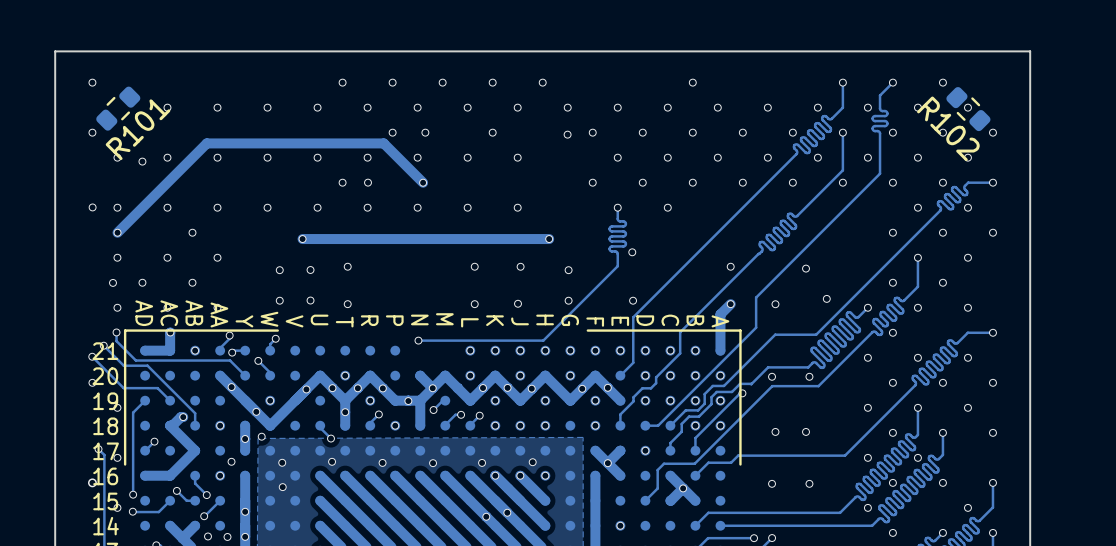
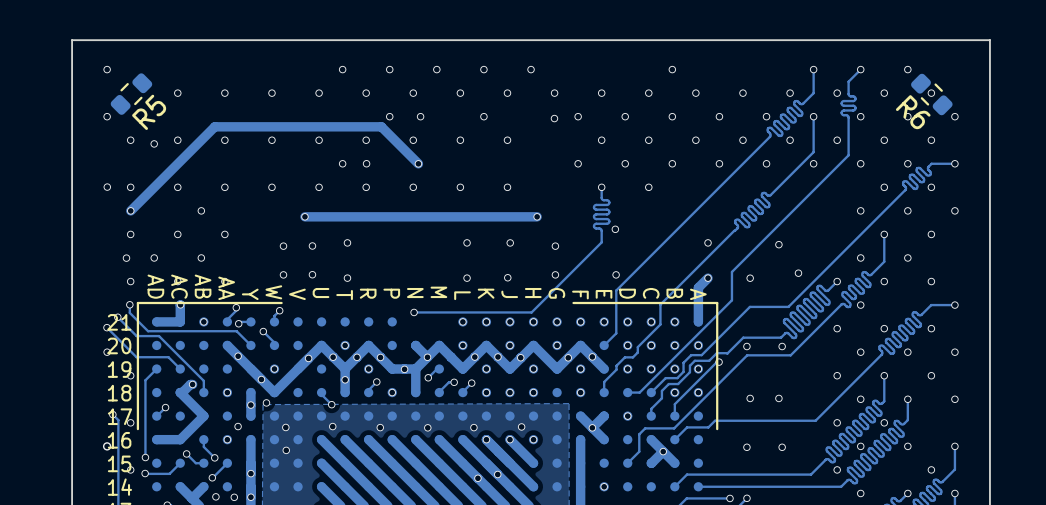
R102 name: R102 (948, 128) -> R6 (913, 112)
R101 name: R101 (138, 129) -> R5 (149, 112)

